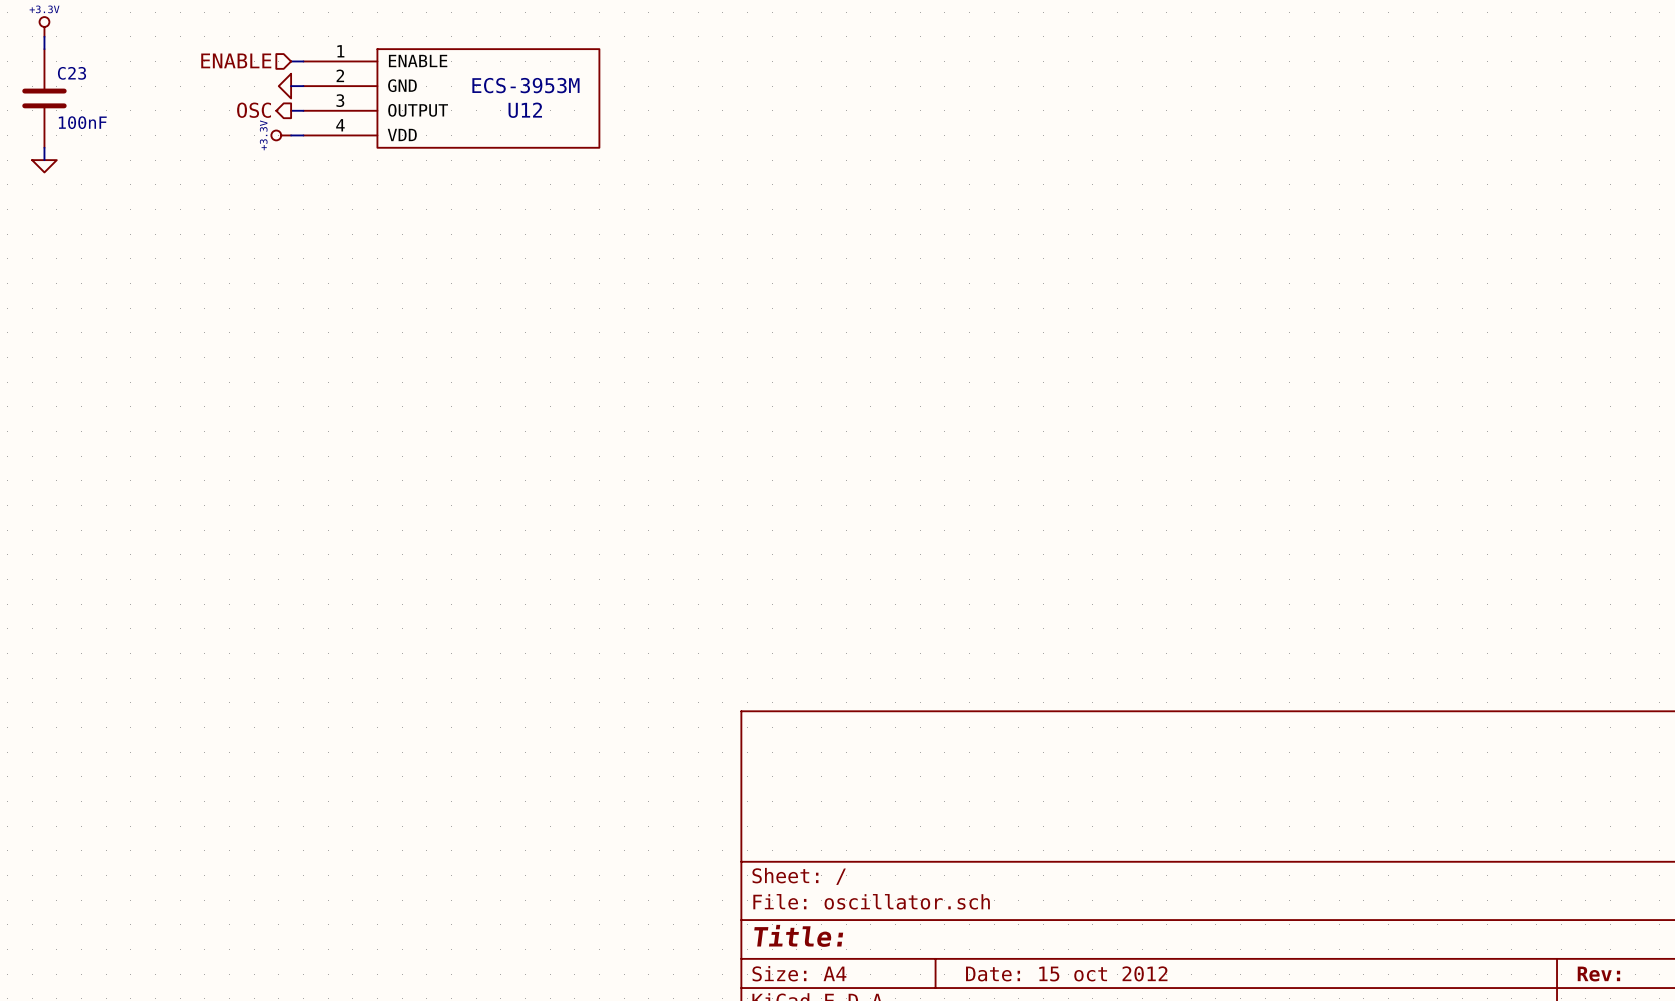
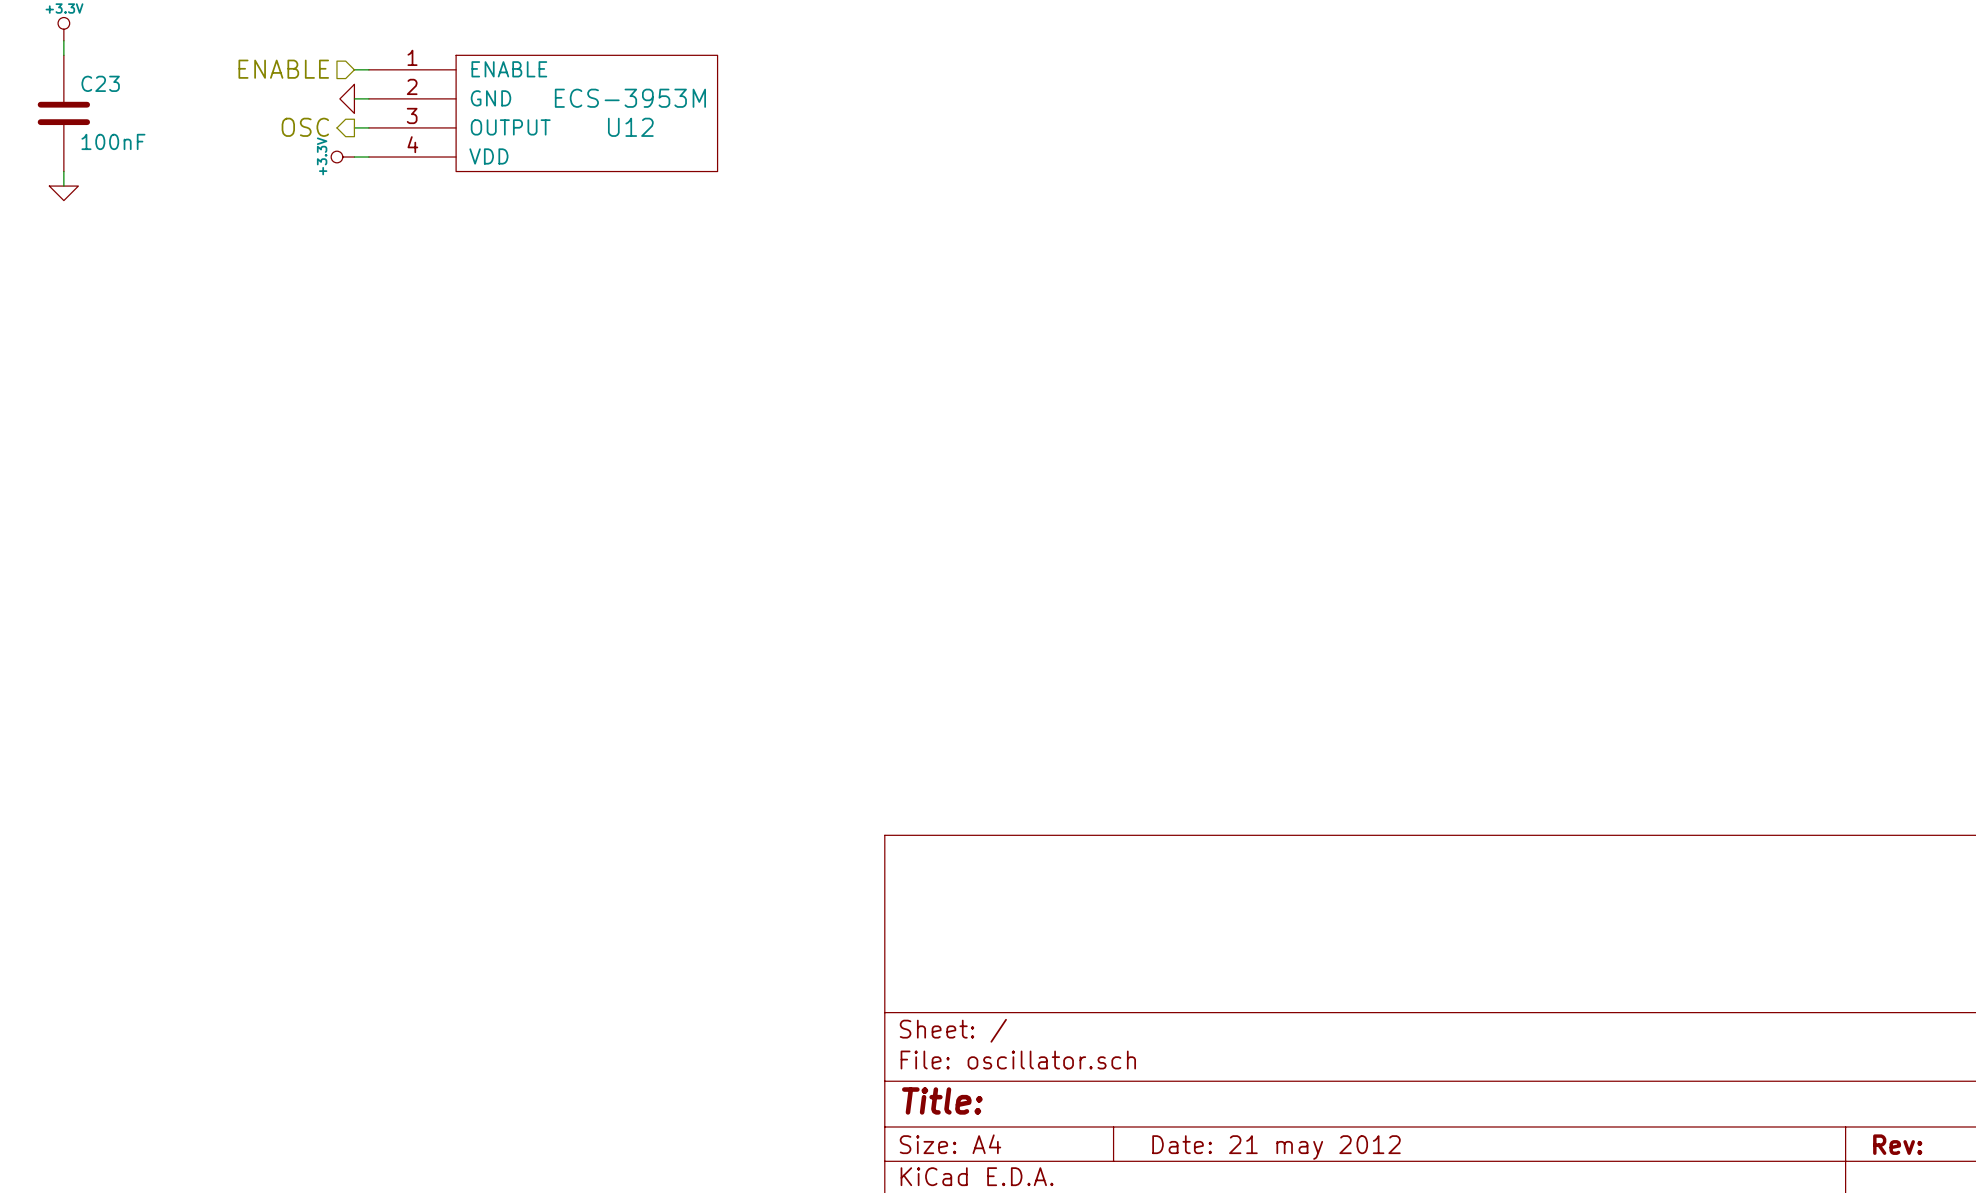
title block: Date: 15 oct 2012 (1066, 973) -> Date: 21 may 2012 (1276, 1147)

